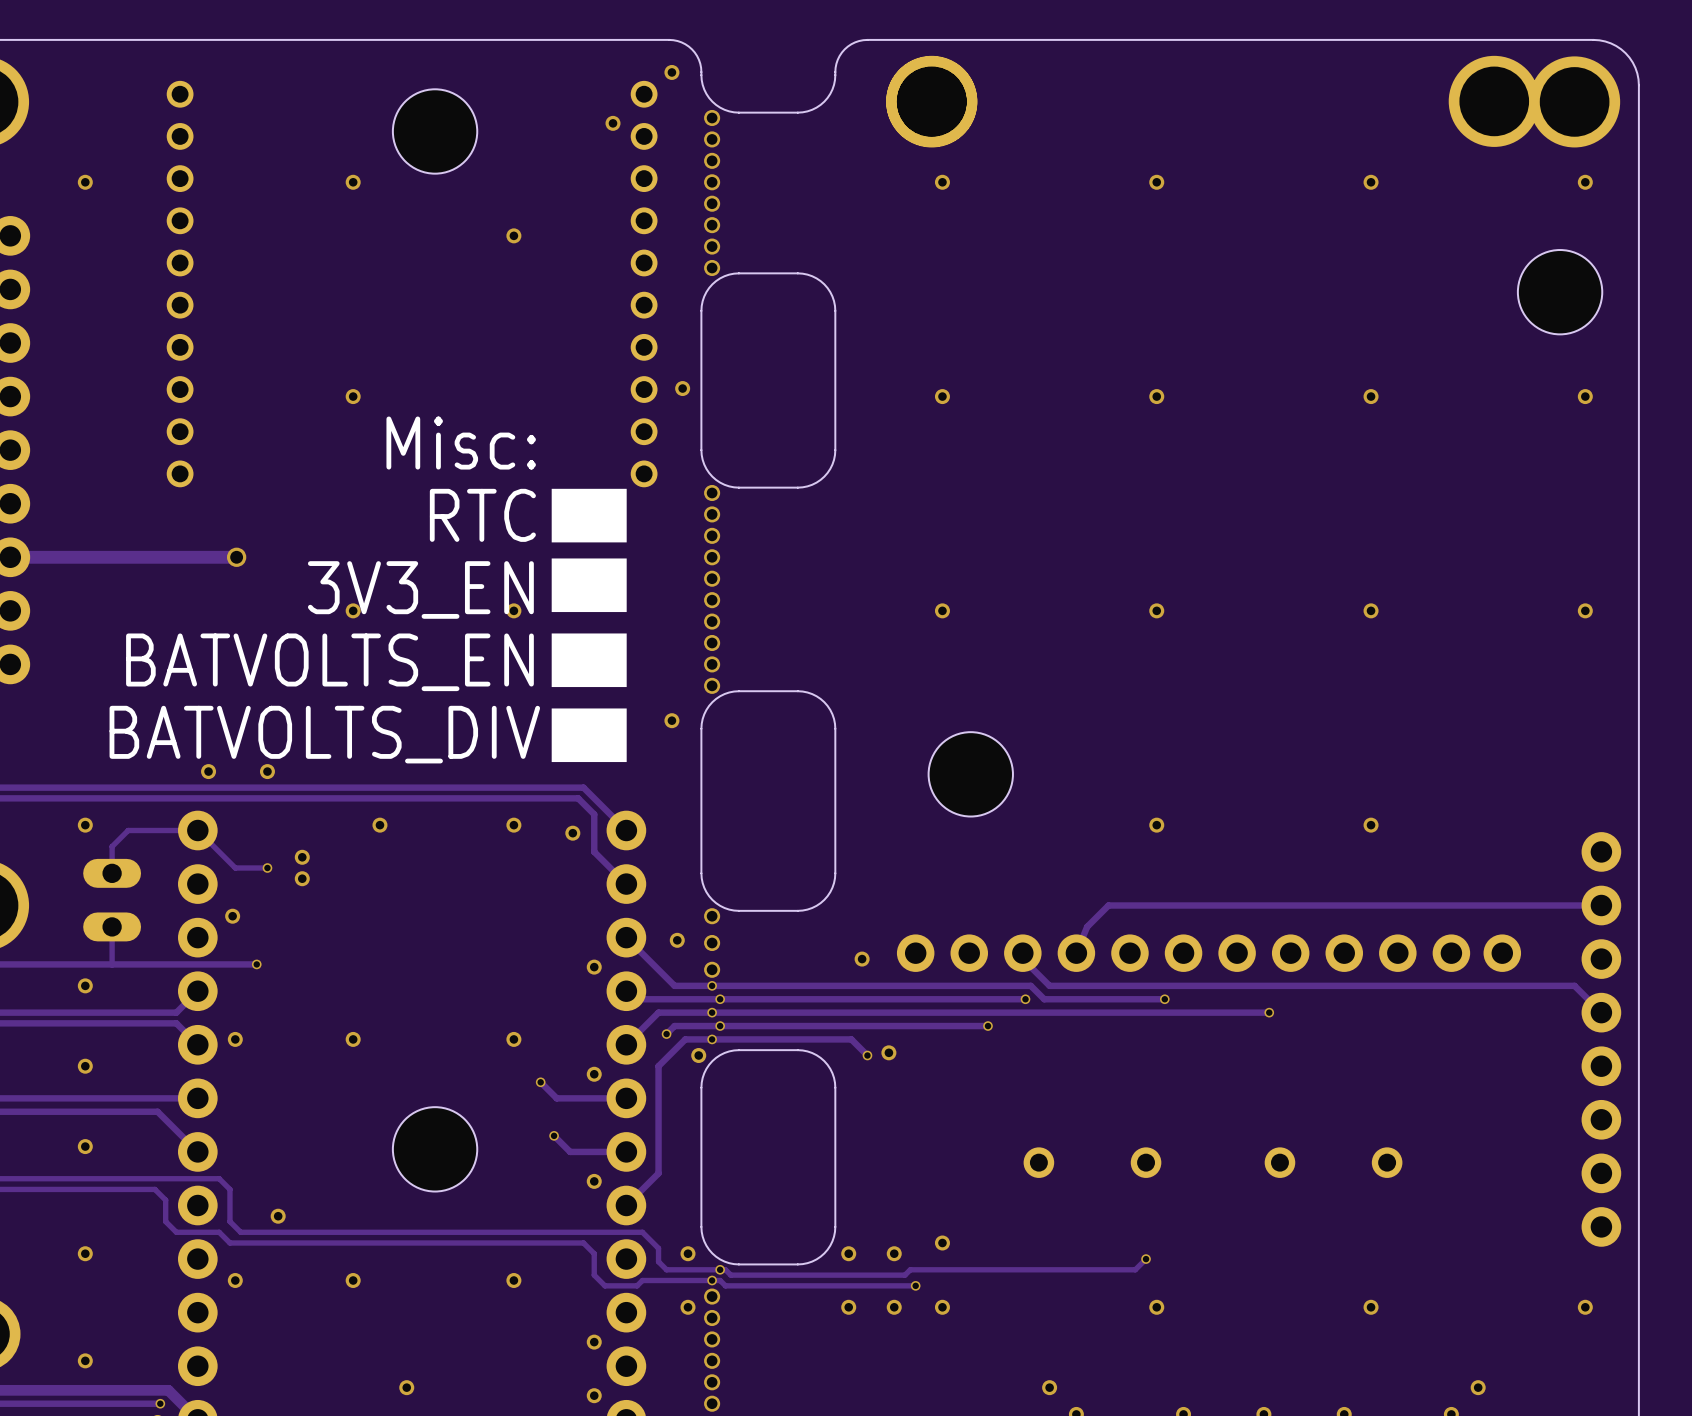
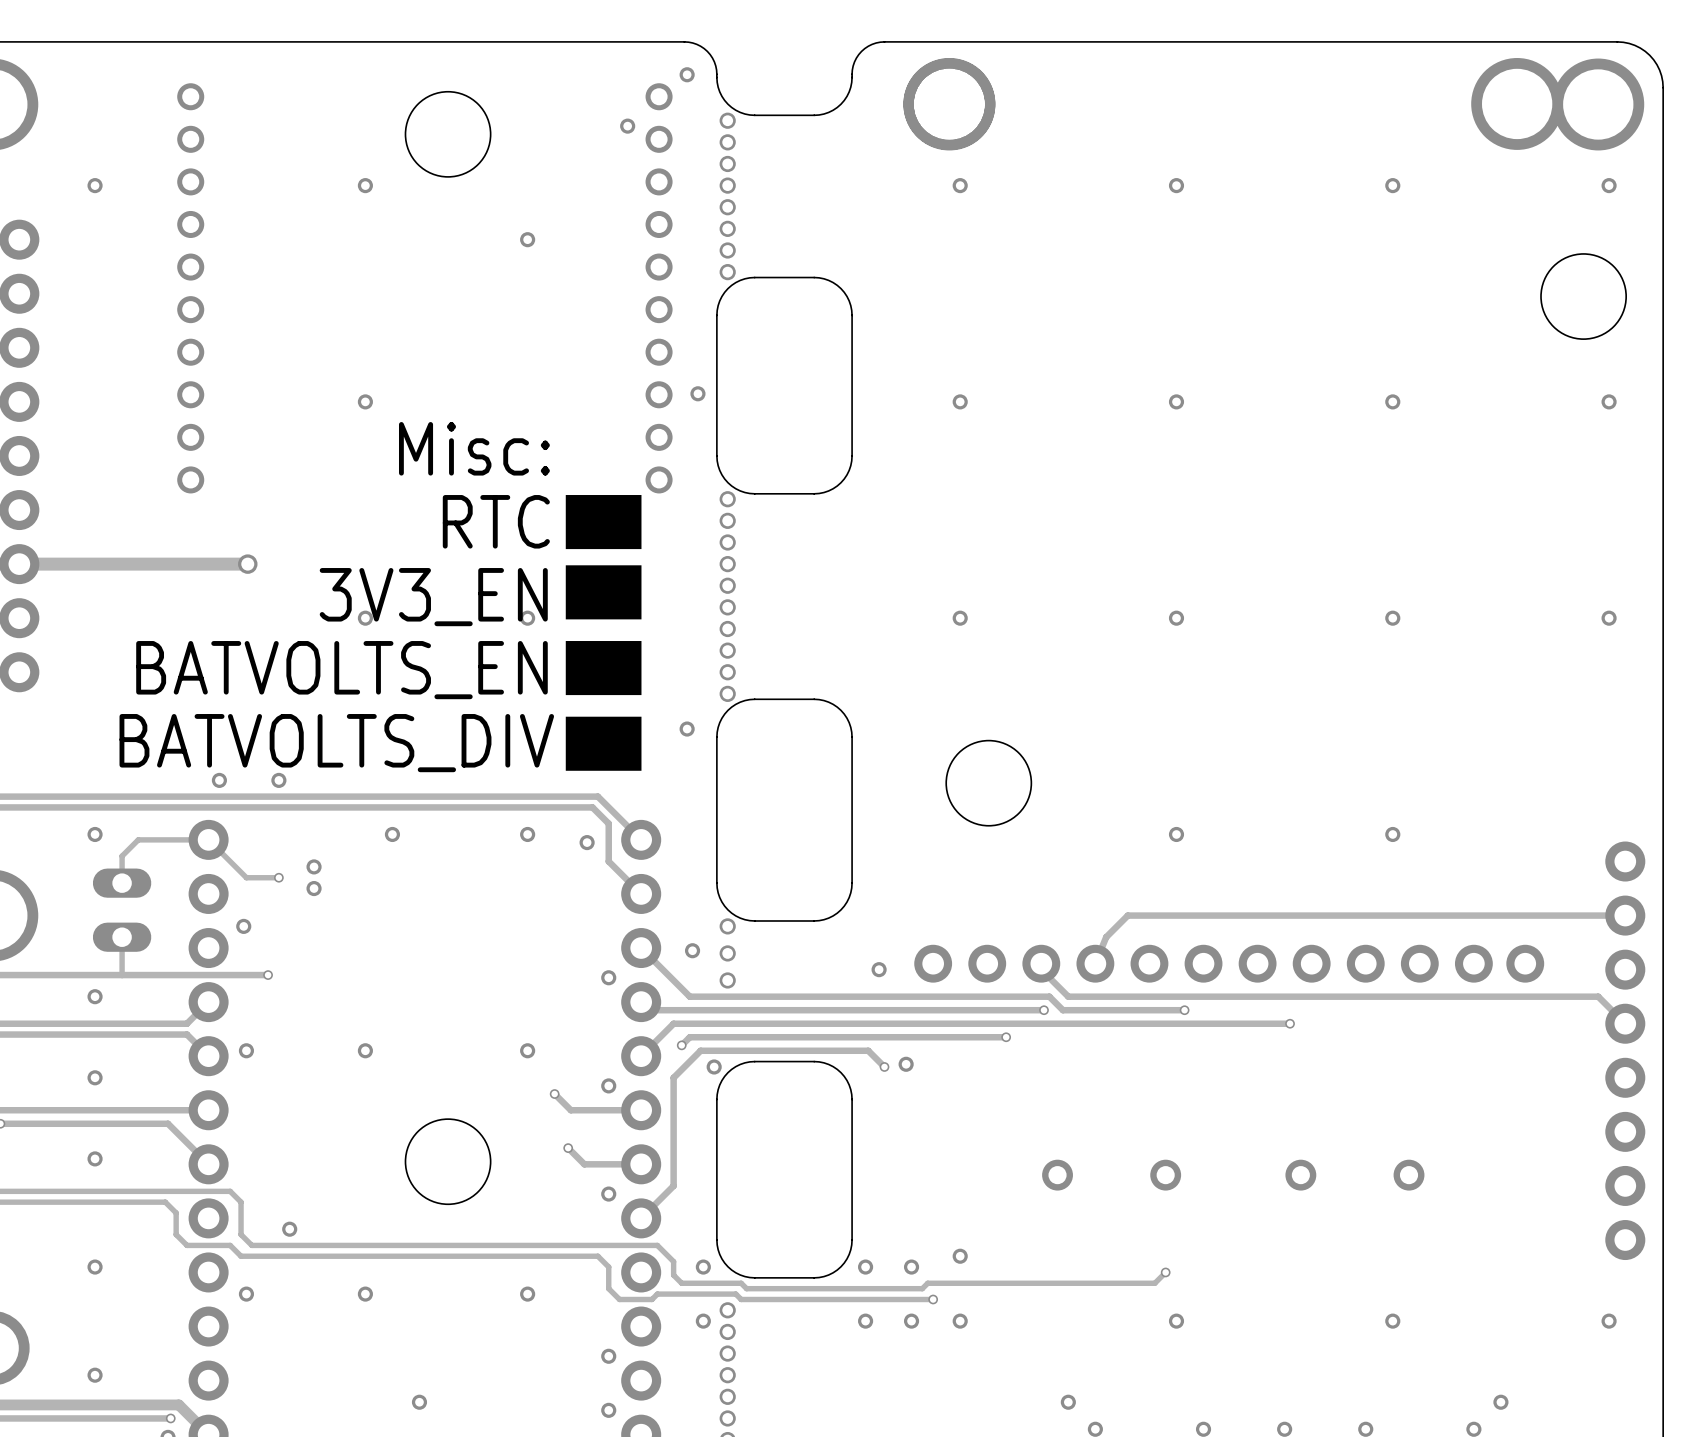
via: (712, 985) -> none
via: (720, 999) -> none
via: (712, 1012) -> none
via: (720, 1026) -> none
via: (712, 1039) -> none
via: (720, 1269) -> none
via: (712, 1280) -> none

